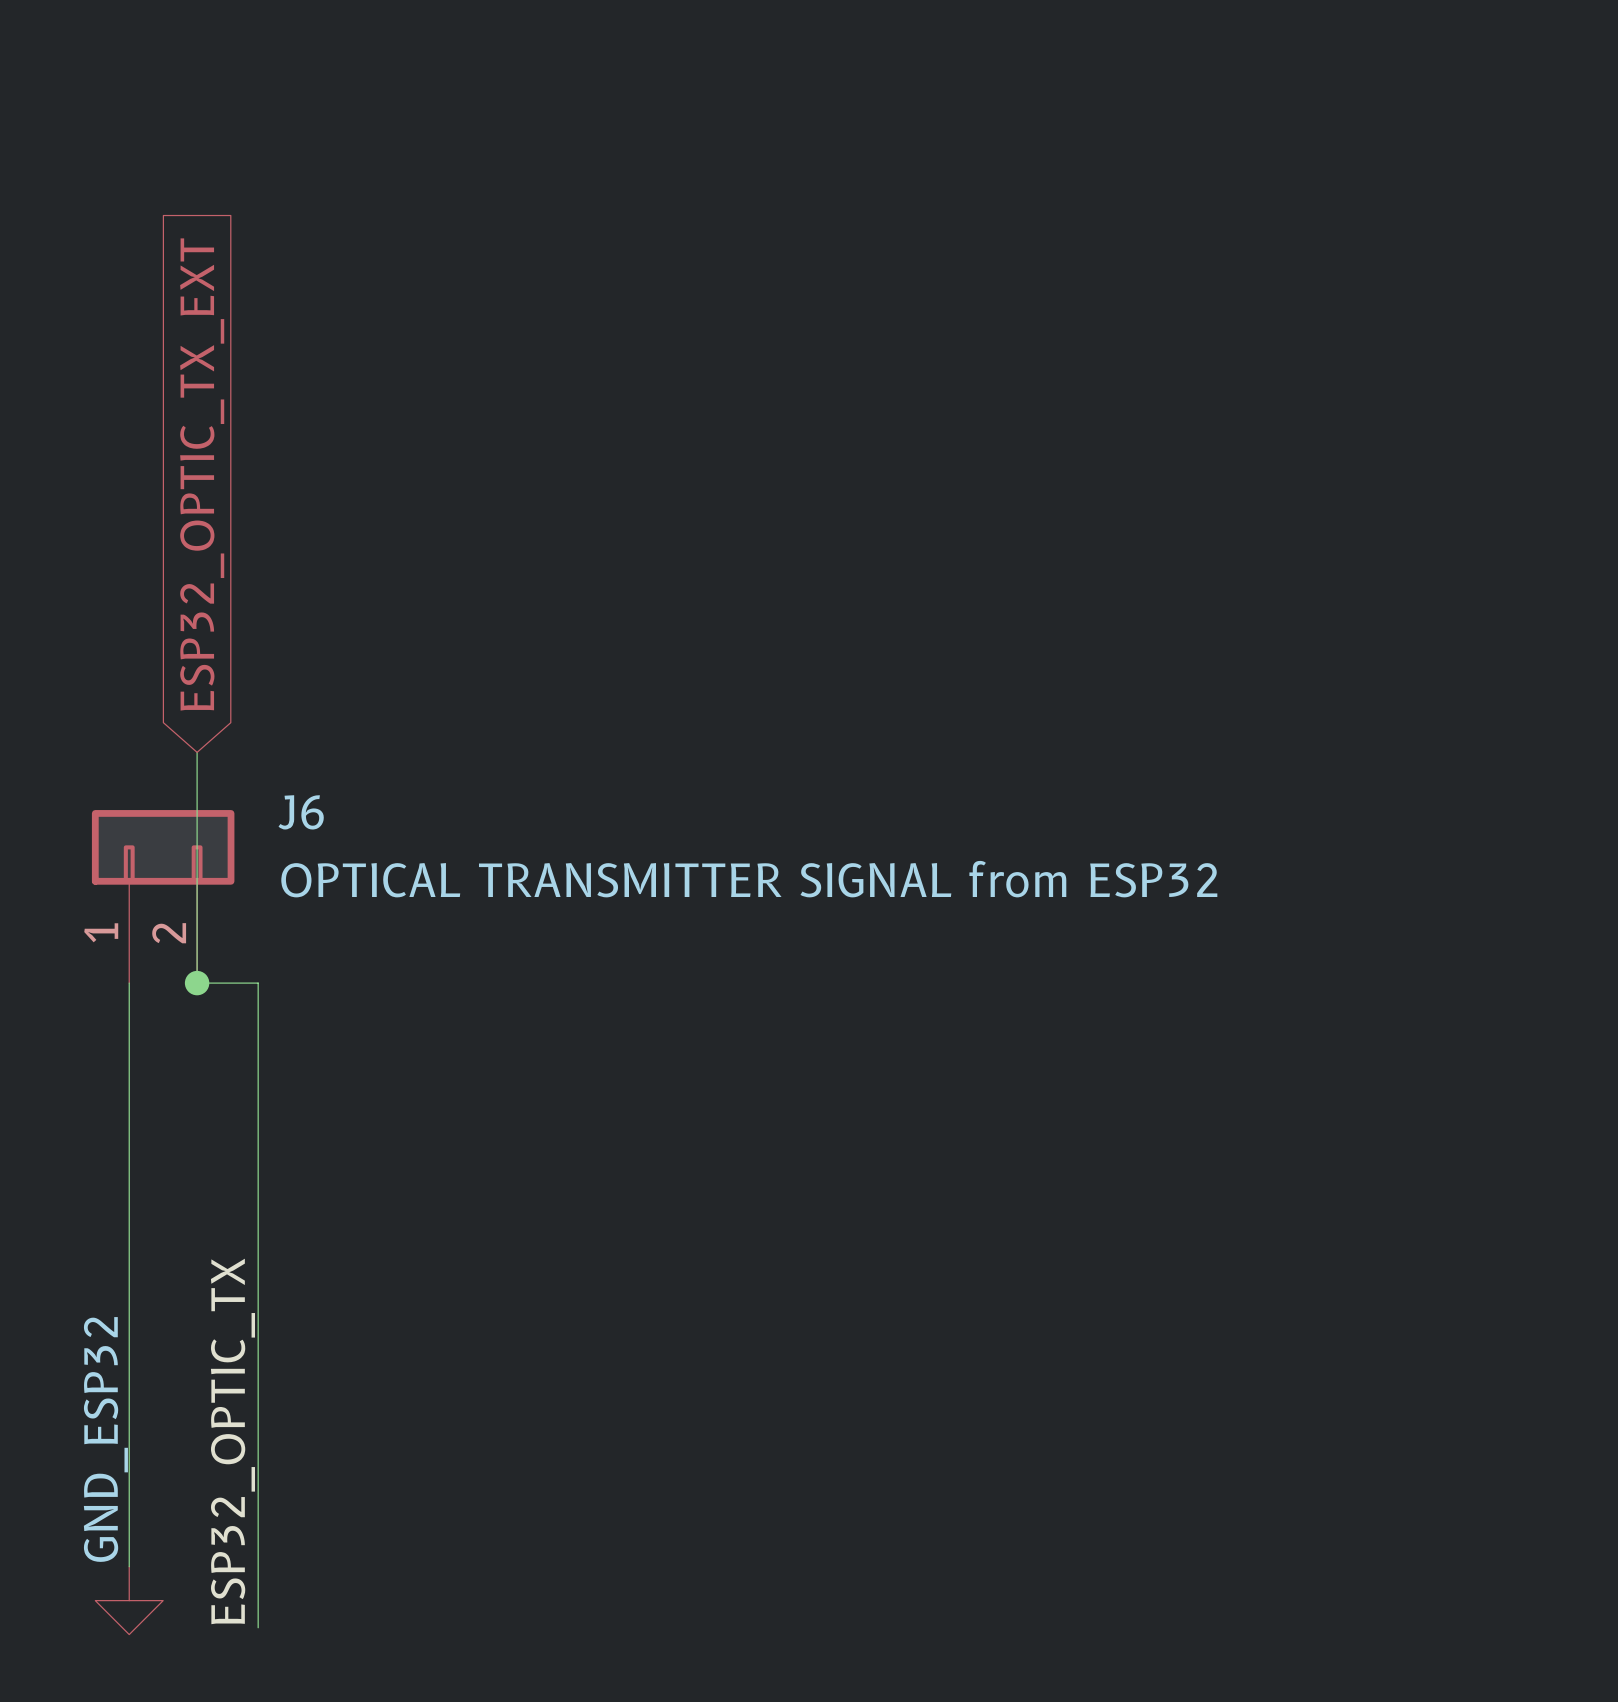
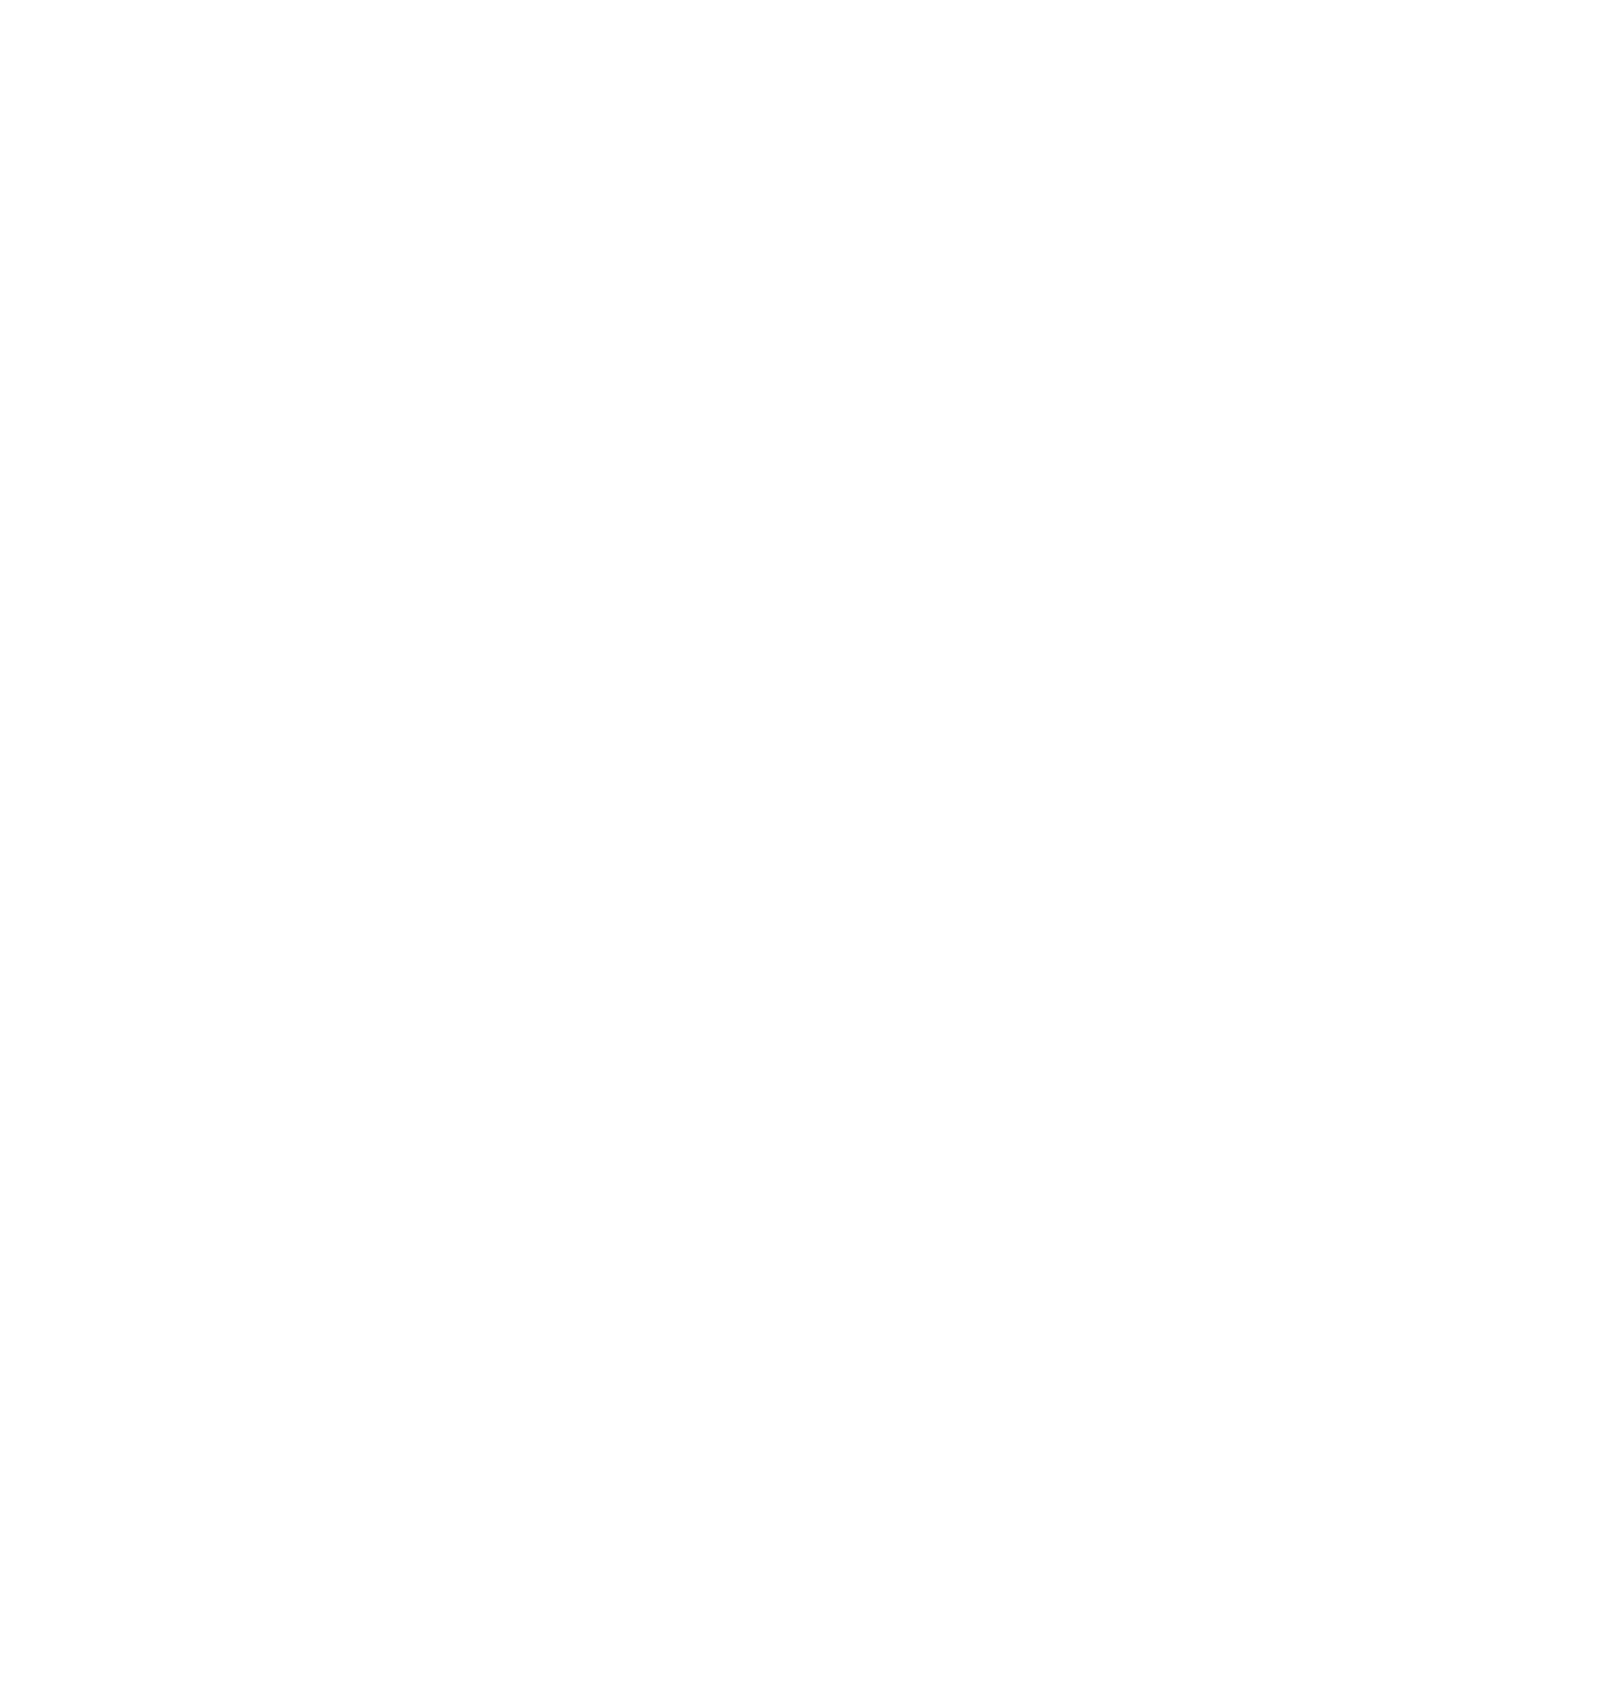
global label: ESP32_OPTIC_TX_EXT (202, 474) -> none
wire: (197, 752) (197, 983) (258, 983) (258, 1627) -> none
J6: OPTICAL TRANSMITTER SIGNAL from ESP32 (163, 896) -> none
wire: (129, 983) (129, 1566) -> none
junction: (197, 983) -> none
label: ESP32_OPTIC_TX (232, 1441) -> none
power symbol: GND_ESP32 (129, 1600) -> none

